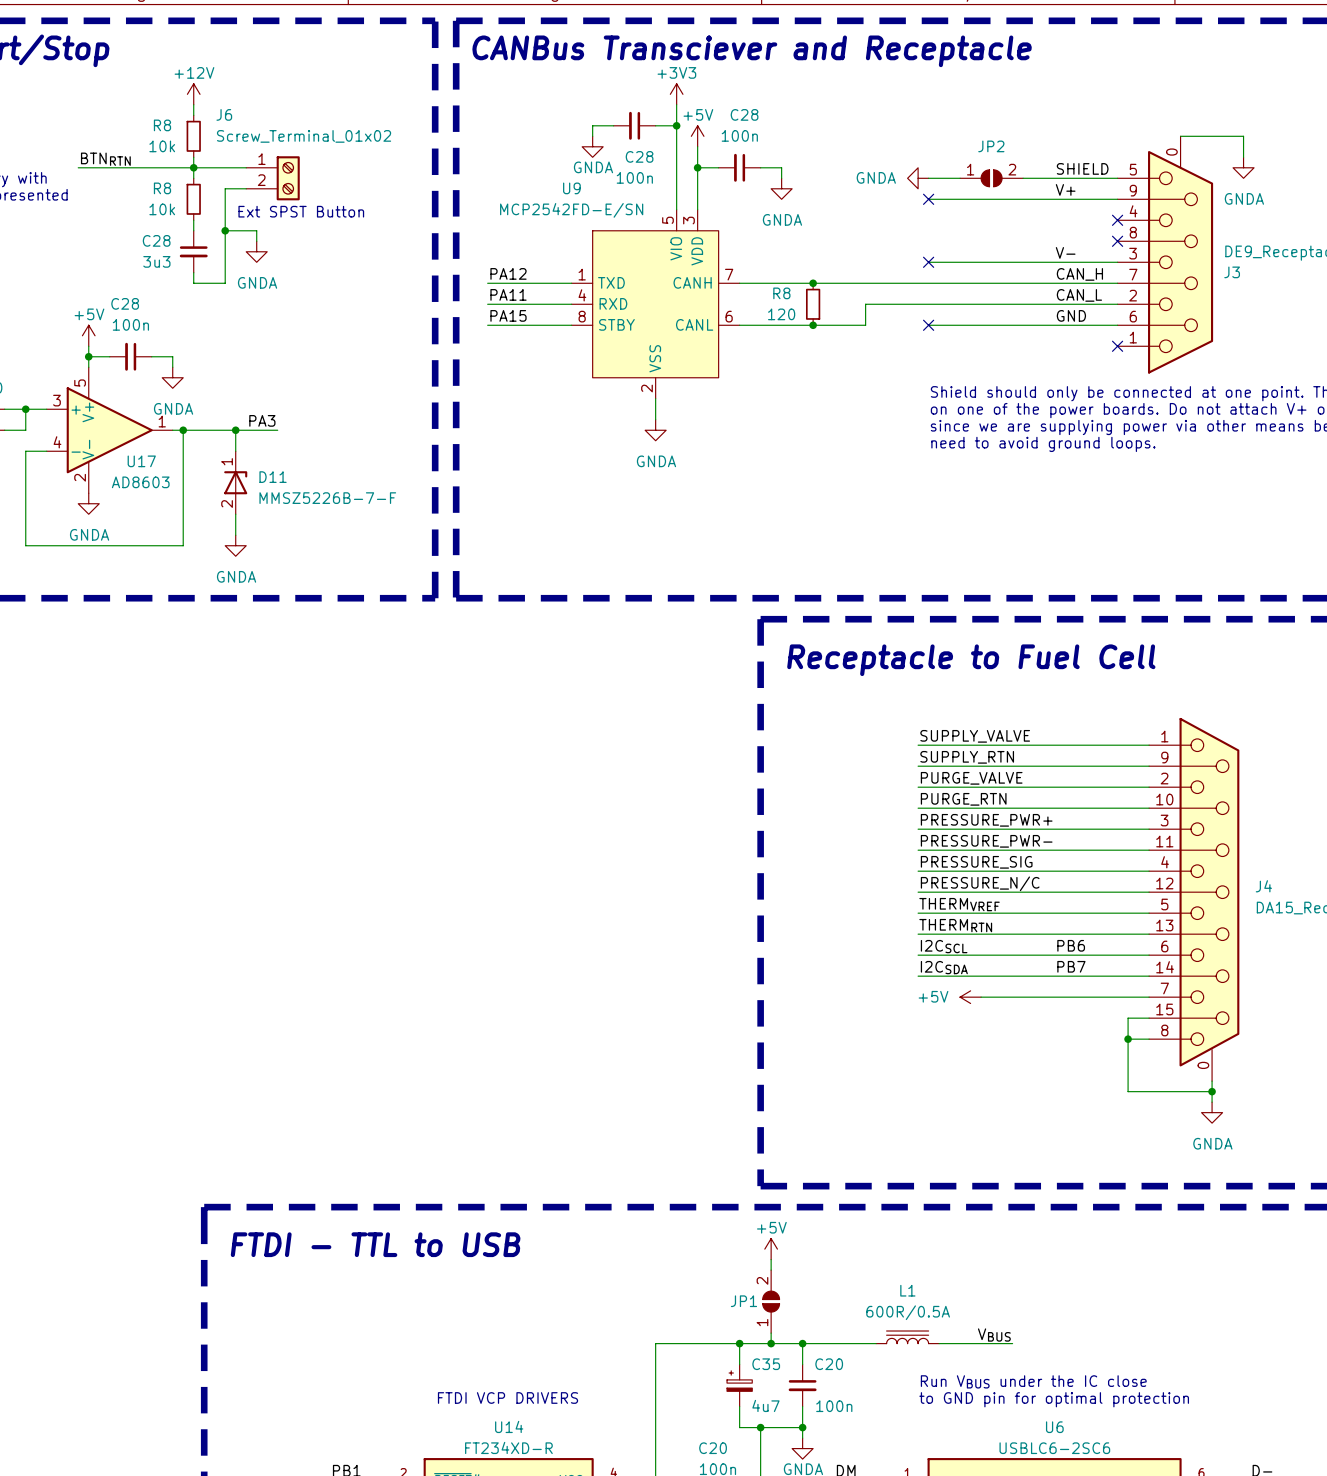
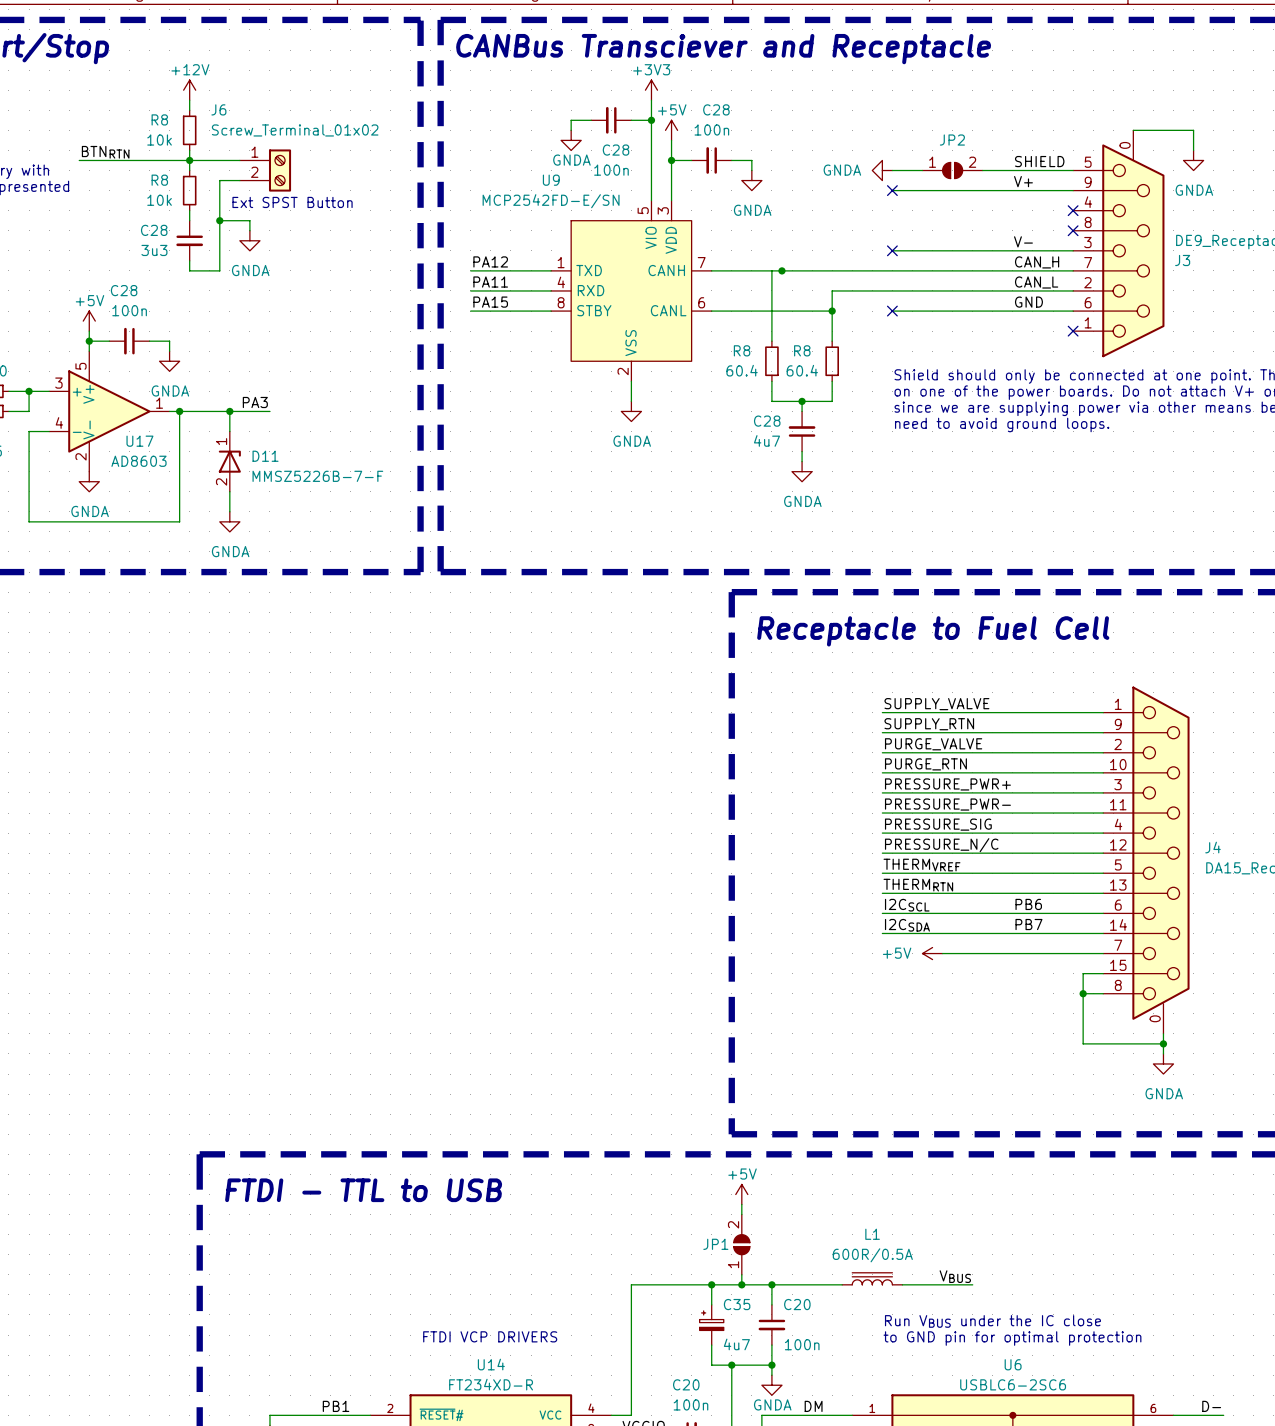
wire: none -> (771, 270) (771, 341)
R8: 120 (813, 304) -> none
junction: (813, 325) -> none
wire: none -> (832, 311) (832, 341)
junction: none -> (832, 311)
R8: none -> 60.4 (771, 361)
R8: none -> 60.4 (832, 361)
wire: none -> (771, 381) (771, 401) (832, 401) (832, 381)
wire: none -> (802, 401) (802, 411)
junction: none -> (802, 401)
C28: none -> 4u7 (802, 431)
wire: none -> (802, 451) (802, 461)
power symbol: none -> GNDA (802, 471)

